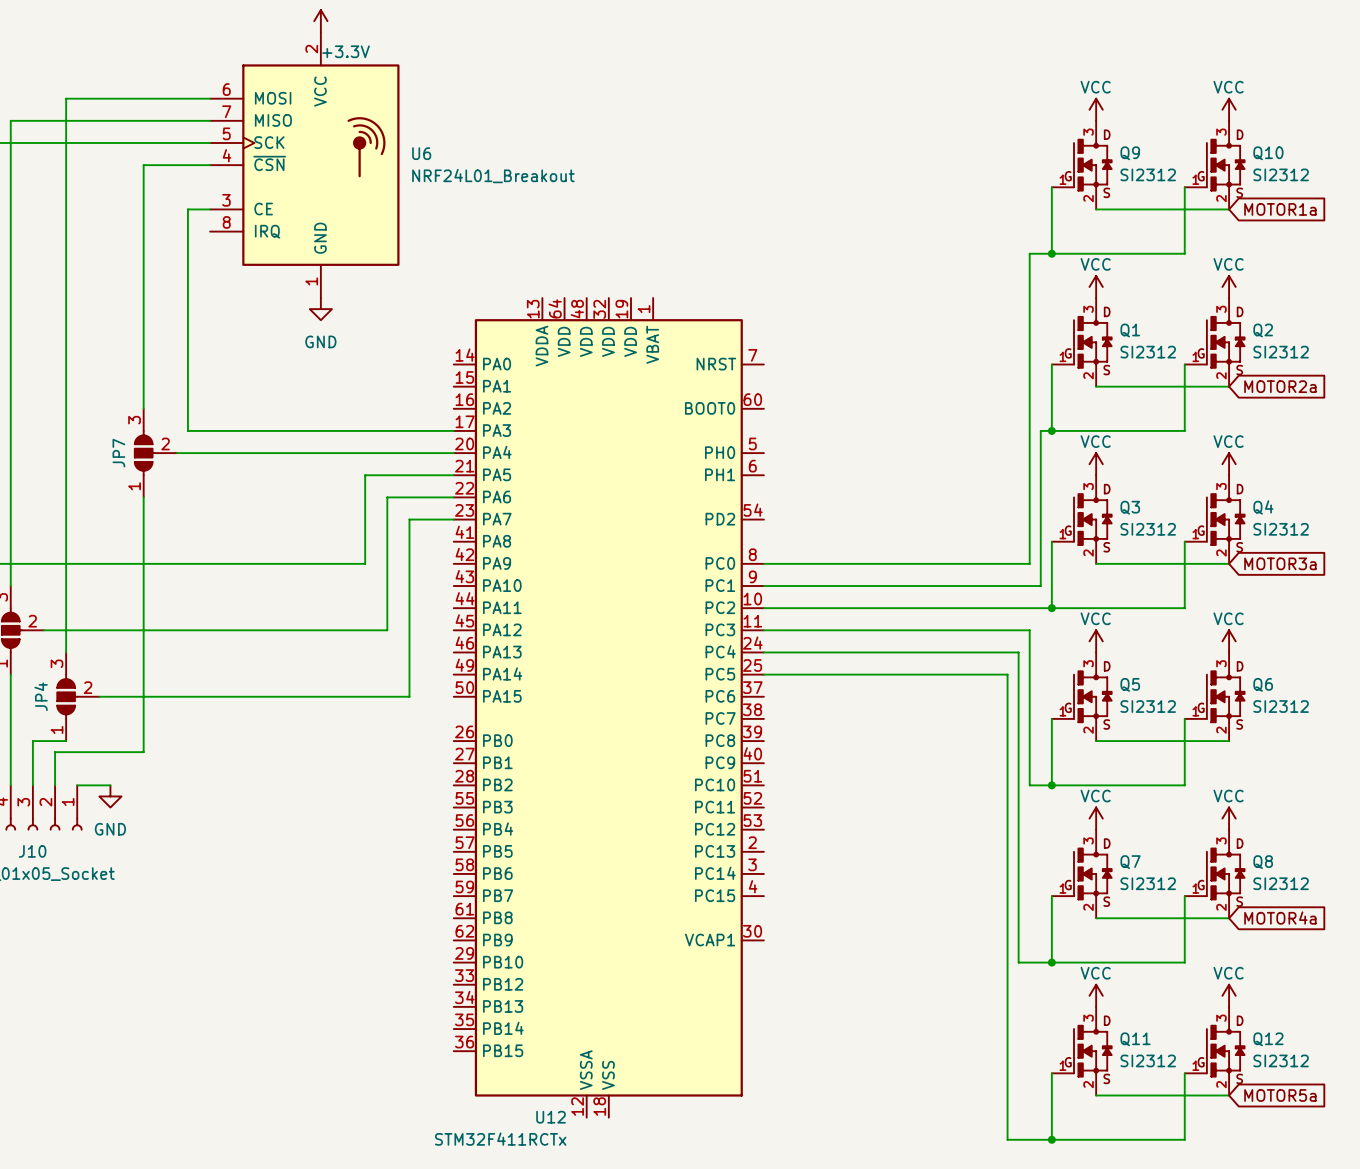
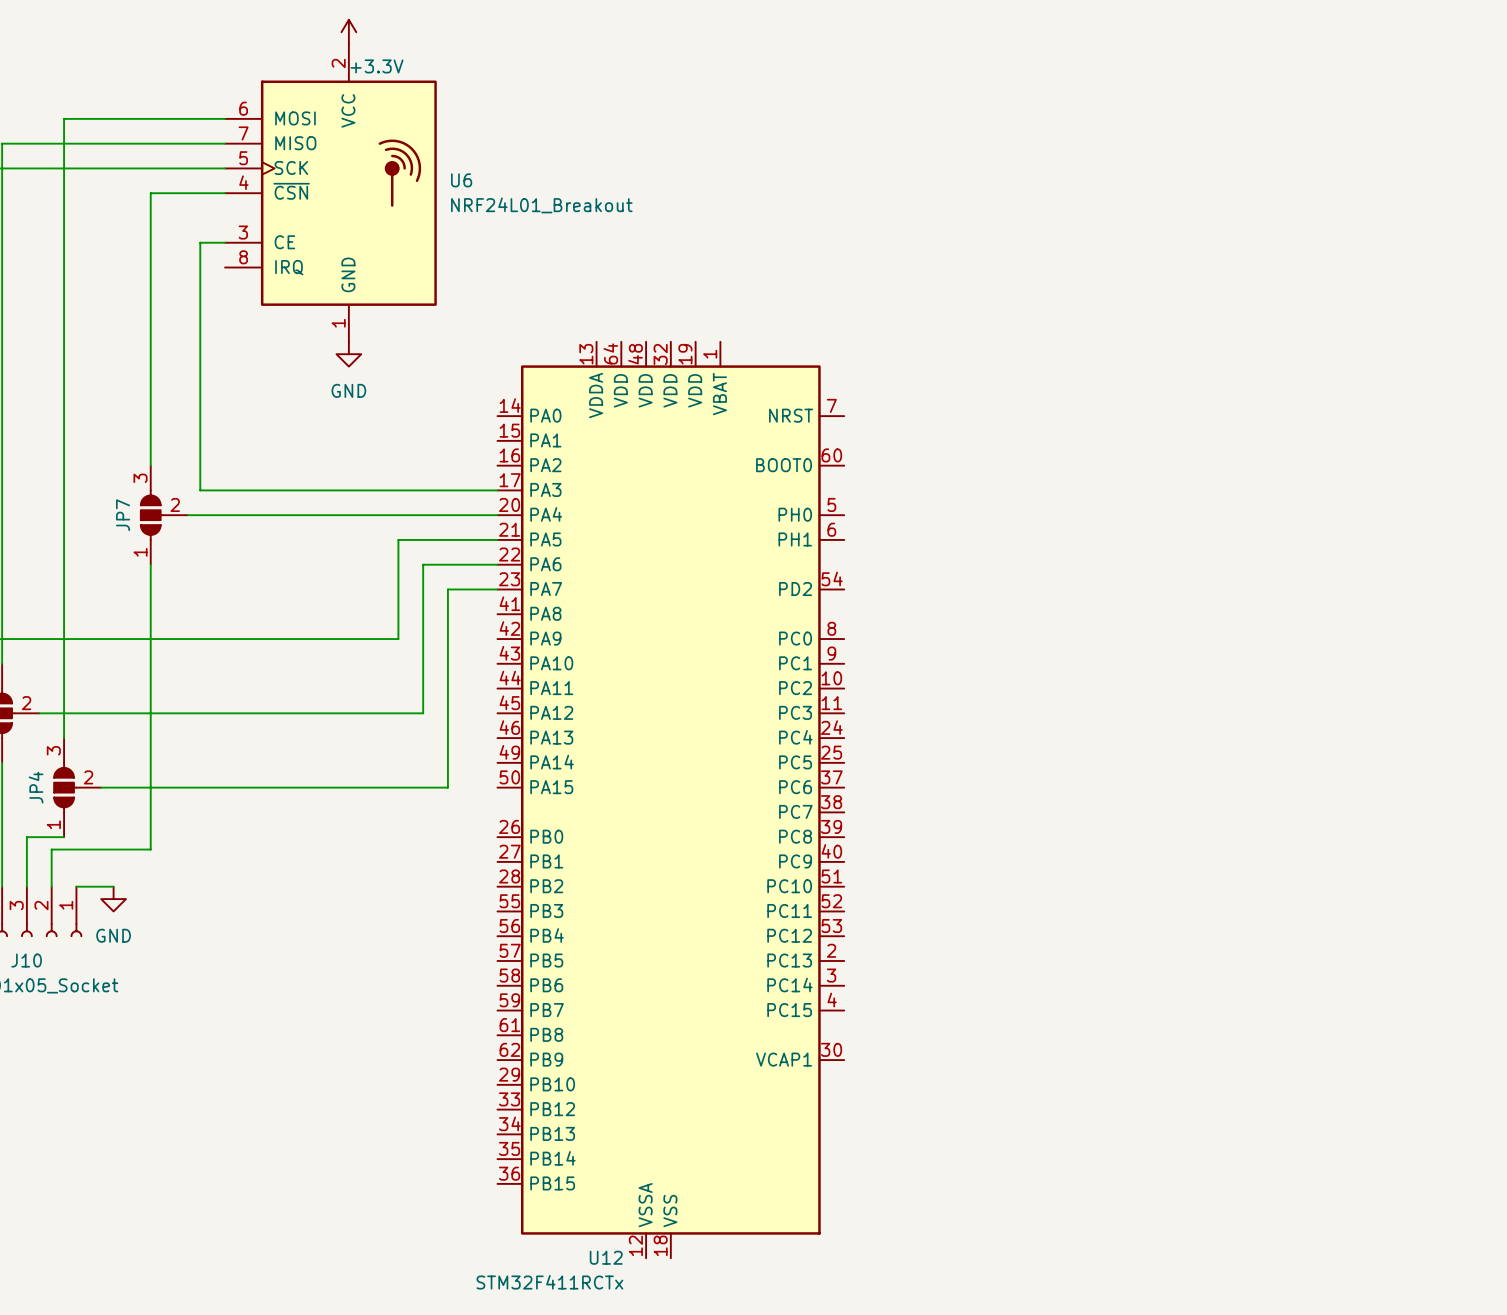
power symbol: VCC (1096, 109) -> none
power symbol: VCC (1229, 109) -> none
Q9: SI2312 (1082, 165) -> none
Q10: SI2312 (1215, 165) -> none
wire: (1051, 187) (1051, 253) -> none
wire: (1184, 187) (1184, 253) (1029, 253) (1029, 563) (763, 563) -> none
wire: (1096, 209) (1229, 209) -> none
global label: MOTOR1a (1280, 209) -> none
junction: (1051, 253) -> none
power symbol: VCC (1096, 286) -> none
power symbol: VCC (1229, 286) -> none
Q1: SI2312 (1082, 342) -> none
Q2: SI2312 (1215, 342) -> none
wire: (1051, 364) (1051, 430) -> none
wire: (1184, 364) (1184, 430) (1040, 430) (1040, 586) (763, 586) -> none
wire: (1096, 386) (1229, 386) -> none
global label: MOTOR2a (1280, 386) -> none
junction: (1051, 430) -> none
power symbol: VCC (1096, 464) -> none
power symbol: VCC (1229, 464) -> none
Q3: SI2312 (1082, 519) -> none
Q4: SI2312 (1215, 519) -> none
wire: (1051, 541) (1051, 608) -> none
wire: (1184, 541) (1184, 608) (763, 608) -> none
wire: (1096, 563) (1229, 563) -> none
global label: MOTOR3a (1280, 563) -> none
junction: (1051, 608) -> none
wire: (763, 630) (1029, 630) (1029, 785) (1184, 785) (1184, 718) -> none
power symbol: VCC (1096, 641) -> none
power symbol: VCC (1229, 641) -> none
wire: (763, 652) (1018, 652) (1018, 962) (1184, 962) (1184, 896) -> none
wire: (763, 674) (1007, 674) (1007, 1139) (1184, 1139) (1184, 1073) -> none
Q5: SI2312 (1082, 696) -> none
Q6: SI2312 (1215, 696) -> none
wire: (1051, 718) (1051, 785) -> none
wire: (1096, 741) (1229, 741) -> none
junction: (1051, 785) -> none
power symbol: VCC (1096, 818) -> none
power symbol: VCC (1229, 818) -> none
Q7: SI2312 (1082, 873) -> none
Q8: SI2312 (1215, 873) -> none
wire: (1051, 896) (1051, 962) -> none
wire: (1096, 918) (1229, 918) -> none
global label: MOTOR4a (1280, 918) -> none
junction: (1051, 962) -> none
power symbol: VCC (1096, 995) -> none
power symbol: VCC (1229, 995) -> none
Q11: SI2312 (1082, 1051) -> none
Q12: SI2312 (1215, 1051) -> none
wire: (1051, 1073) (1051, 1139) -> none
wire: (1096, 1095) (1229, 1095) -> none
global label: MOTOR5a (1280, 1095) -> none
junction: (1051, 1139) -> none

